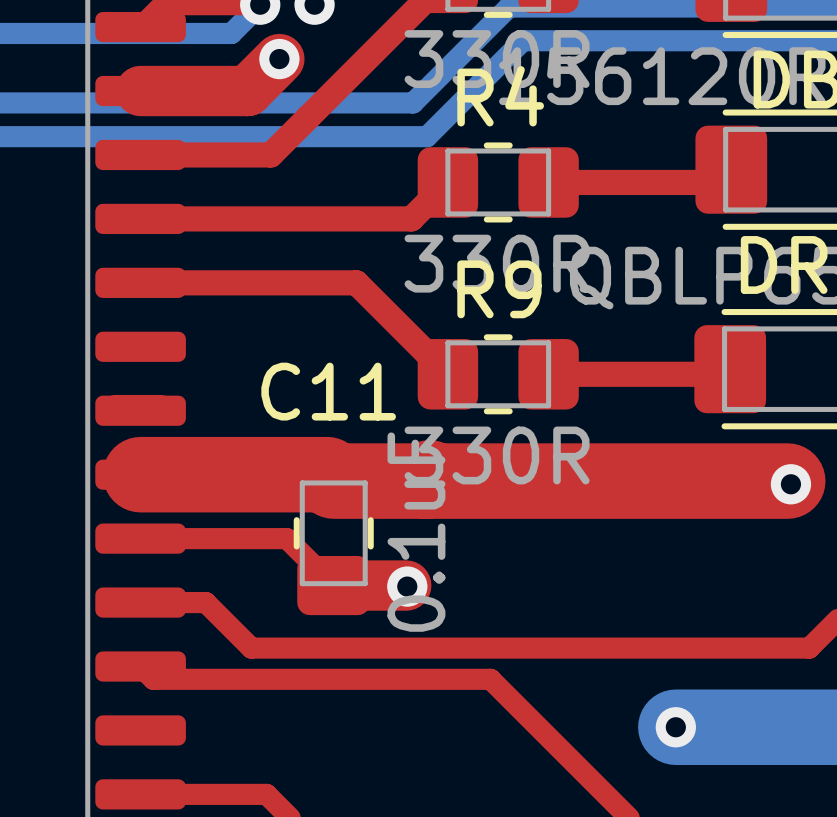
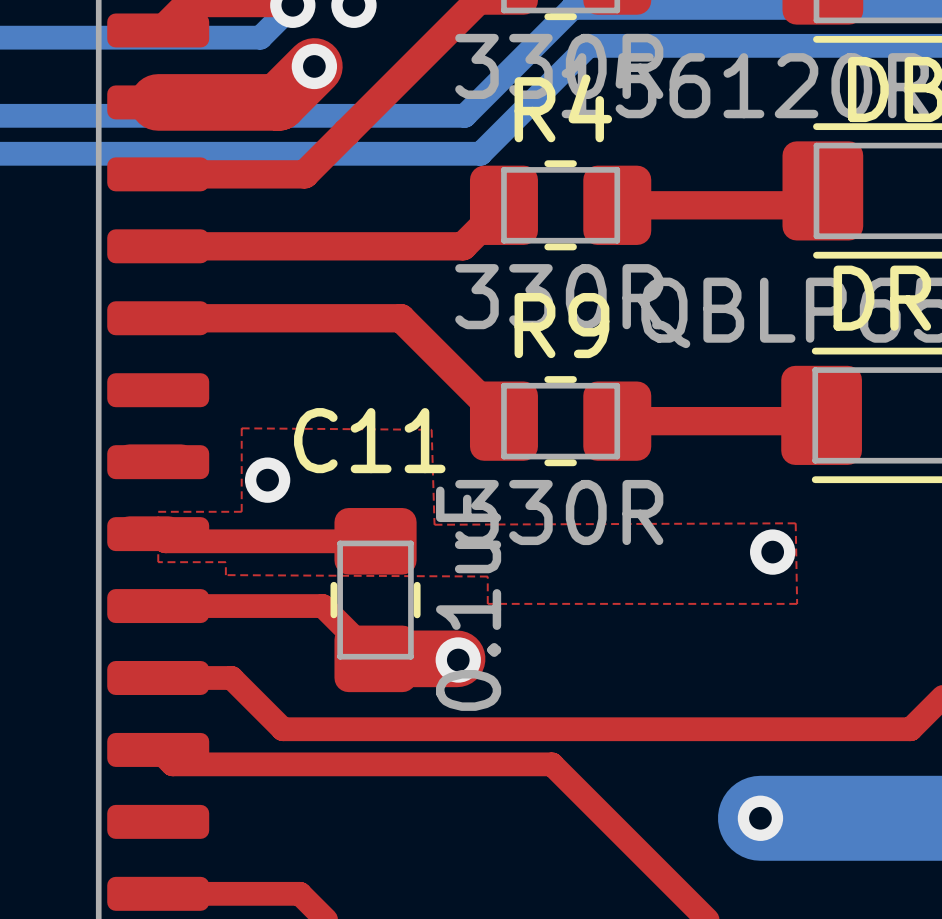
top zone outline: none -> (241, 428) (241, 511) (158, 511) (158, 562) (225, 562) (225, 575) (487, 576) (487, 603) (797, 603) (795, 523) (434, 524) (431, 429) (241, 428)
via: none -> (267, 480)
top track: (140, 474) (327, 474) (333, 481) (787, 481) (790, 484) -> (158, 534) (165, 541) (375, 541) (378, 538)
via position: (790, 484) -> (772, 552)

